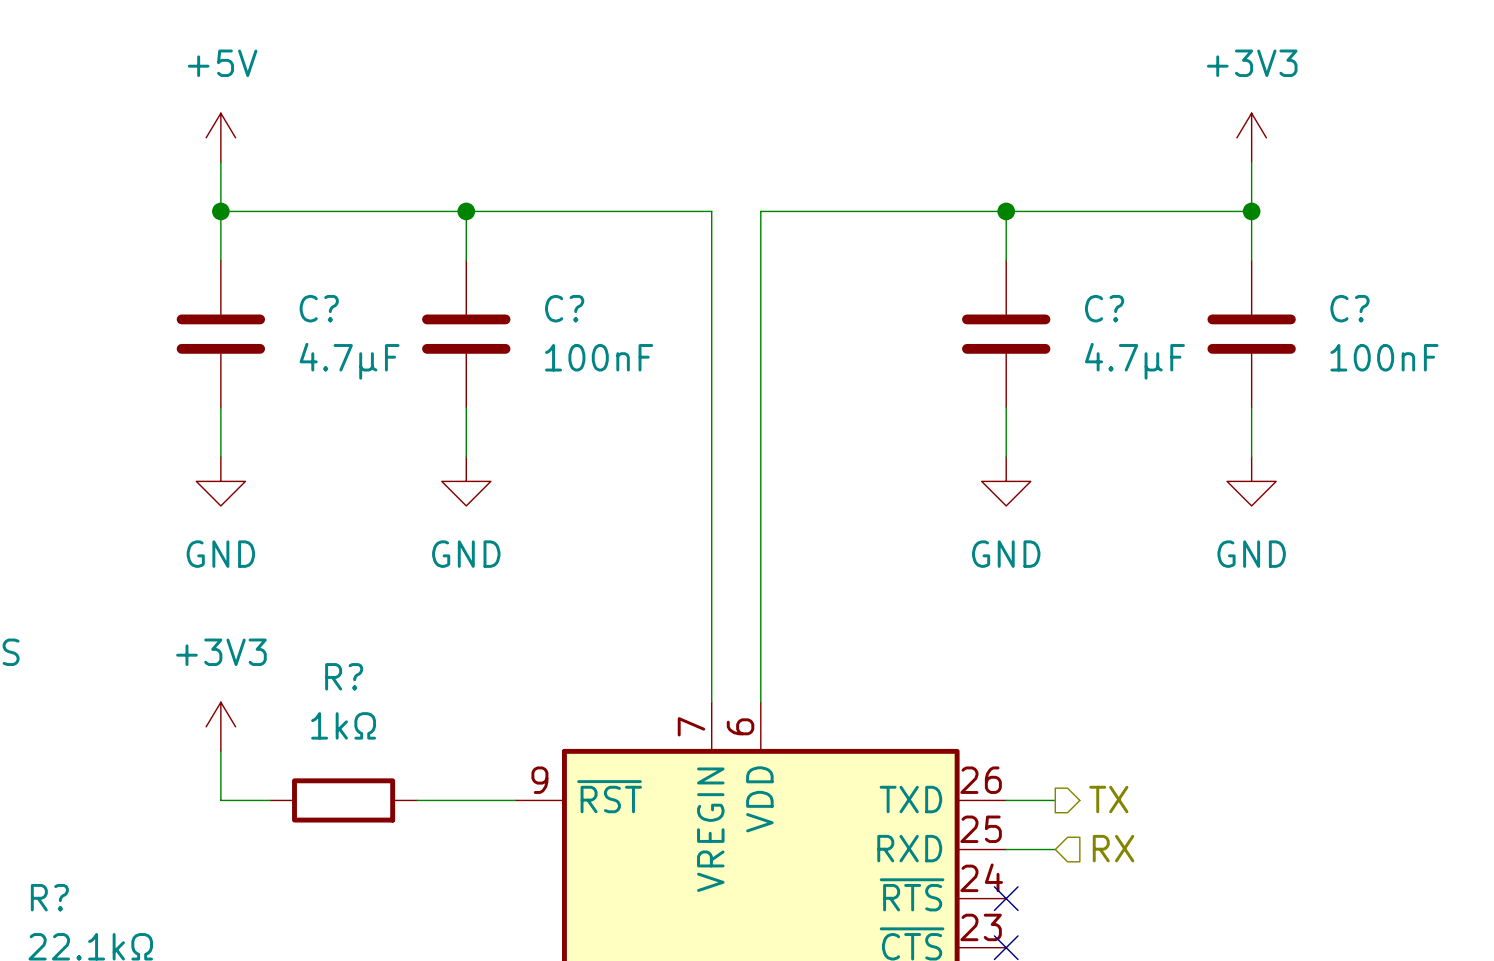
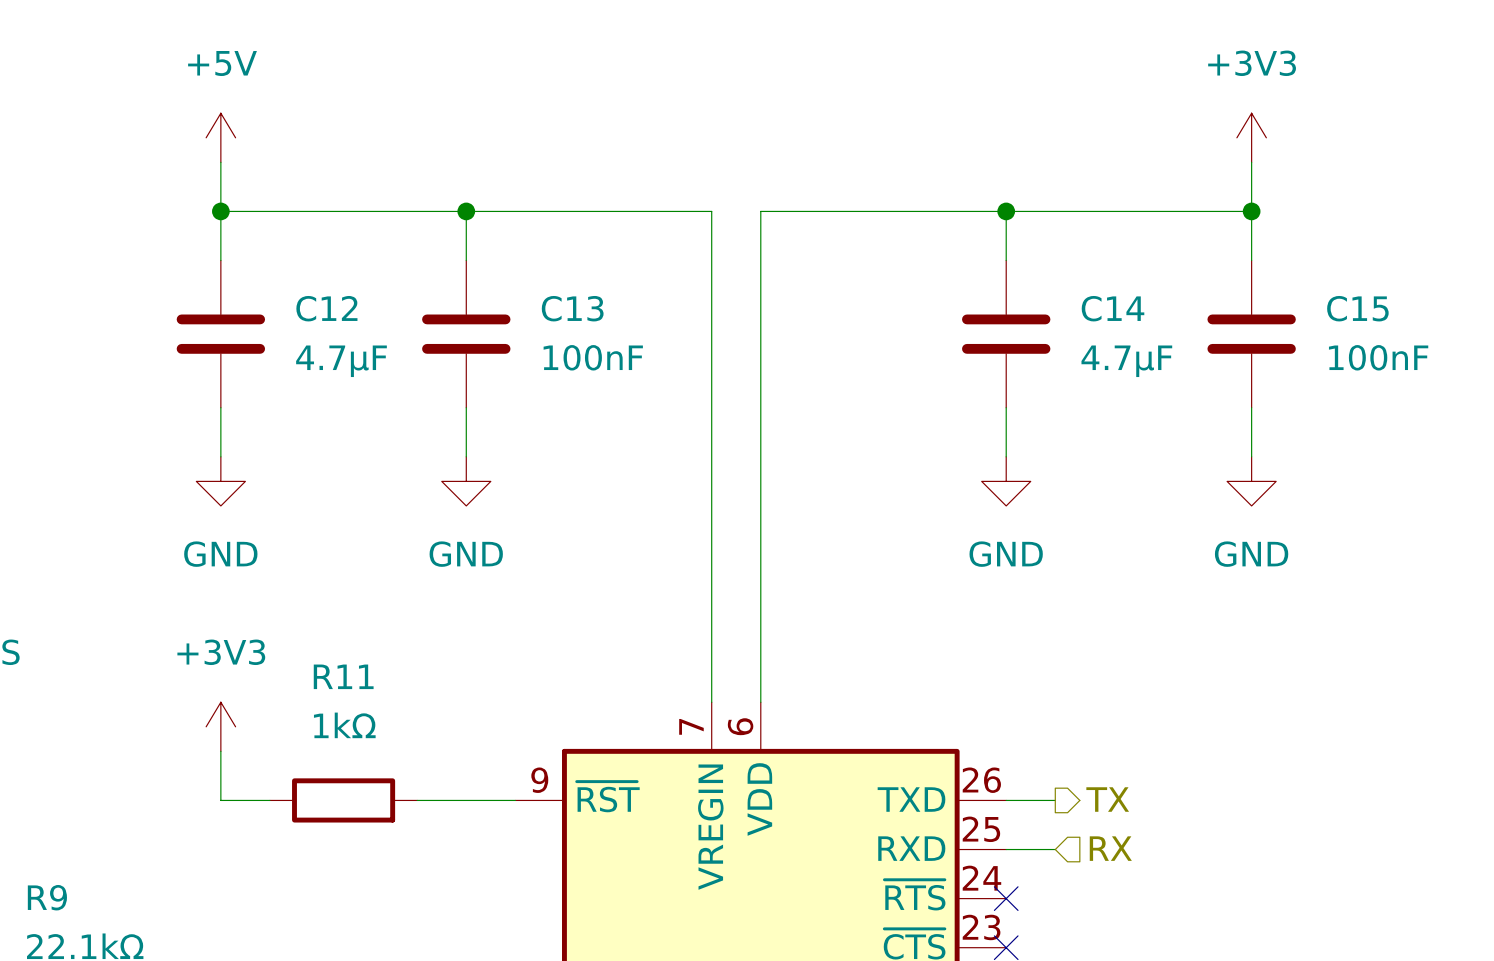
C? name: C? (319, 308) -> C12 (326, 308)
C? name: C? (564, 308) -> C13 (572, 308)
C? name: C? (1104, 308) -> C14 (1113, 308)
C? name: C? (1349, 308) -> C15 (1357, 308)
R? name: R? (344, 676) -> R11 (343, 676)
R? name: R? (49, 897) -> R9 (47, 897)

